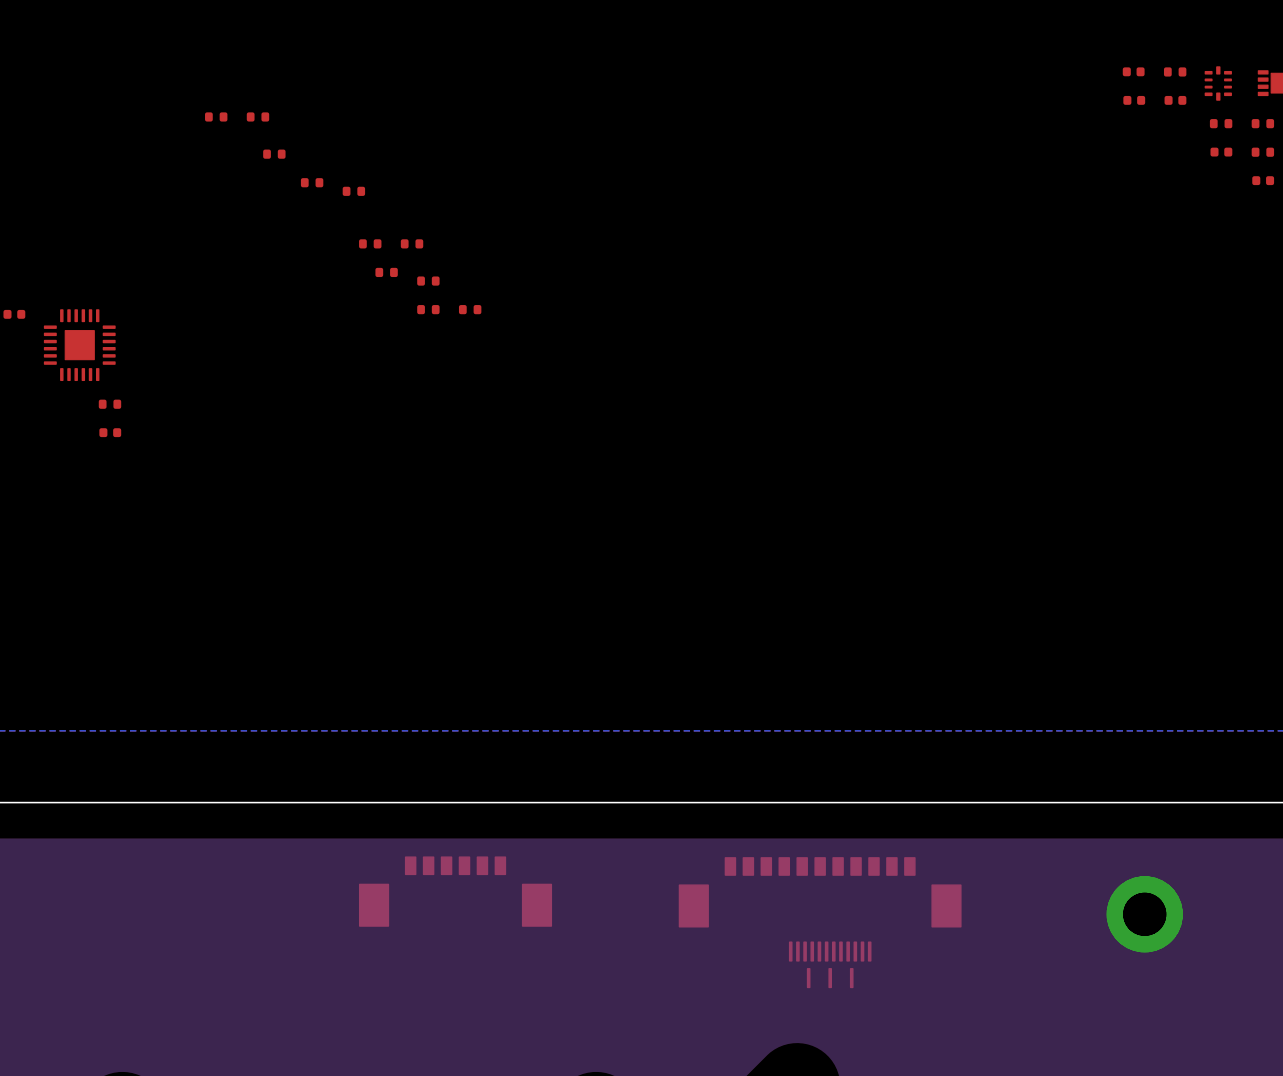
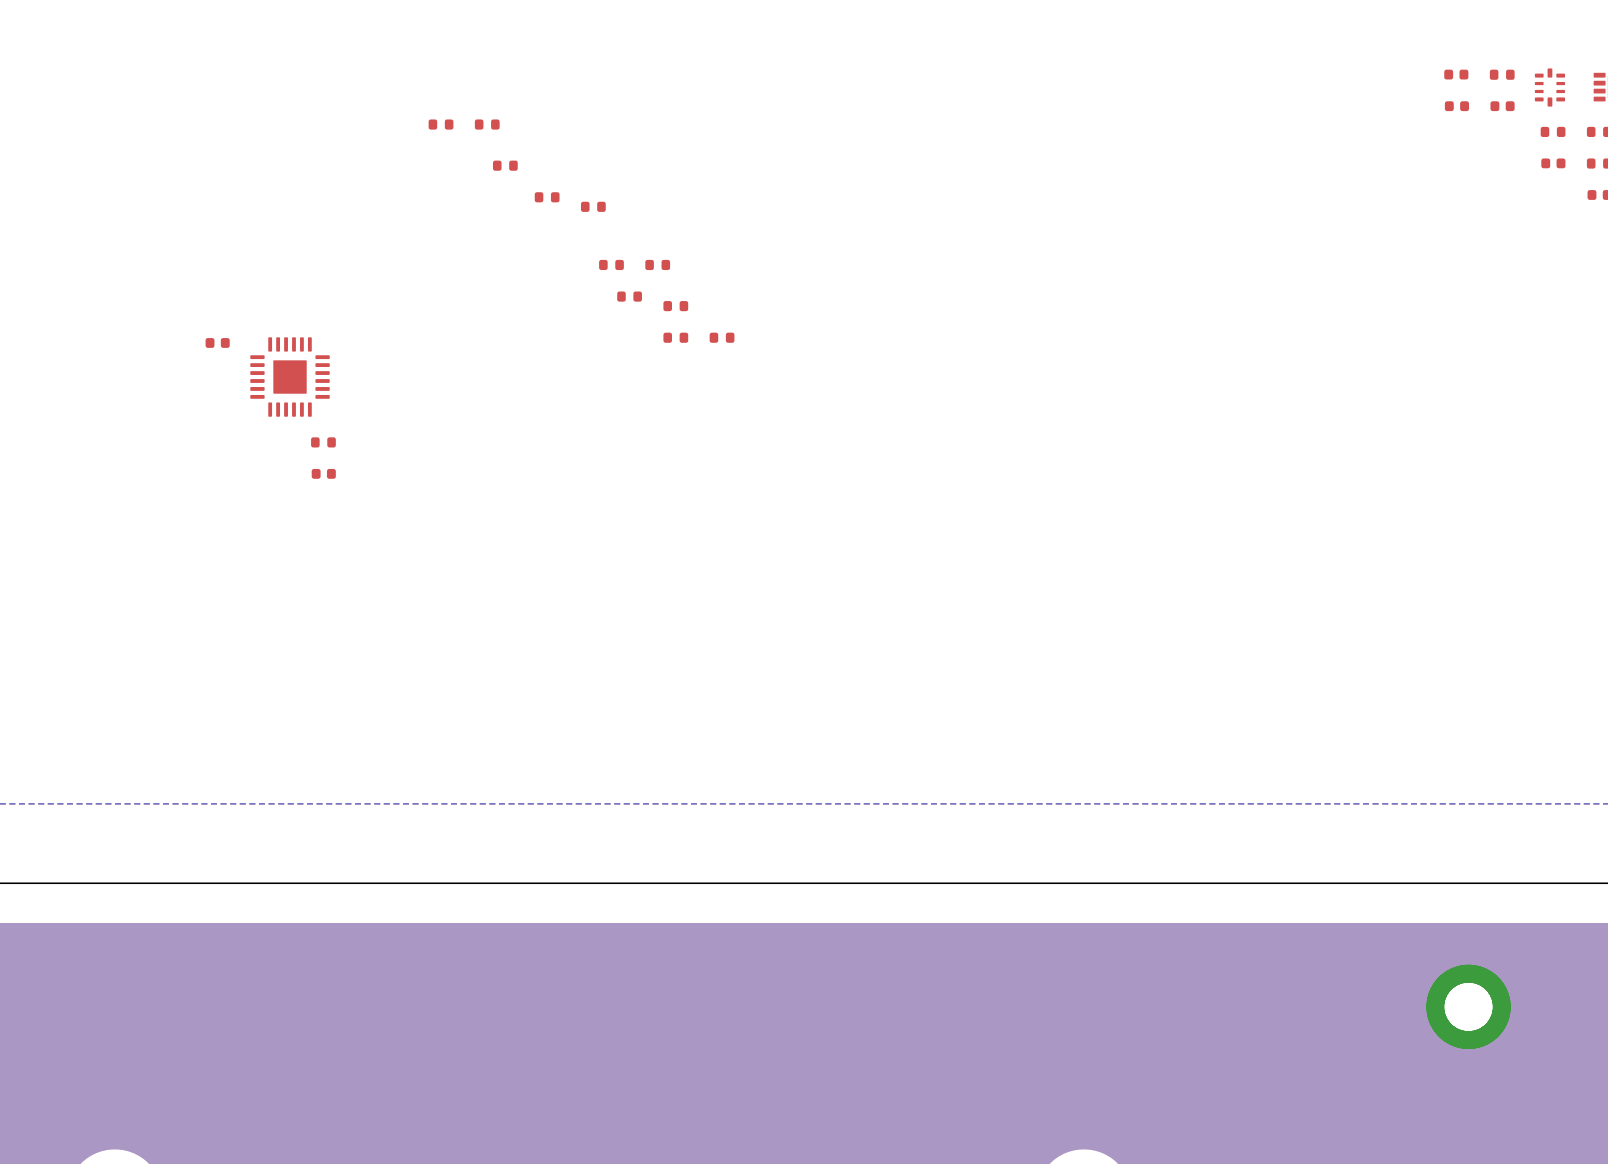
part: (455, 891) -> none
part: (820, 892) -> none
part: (830, 964) -> none

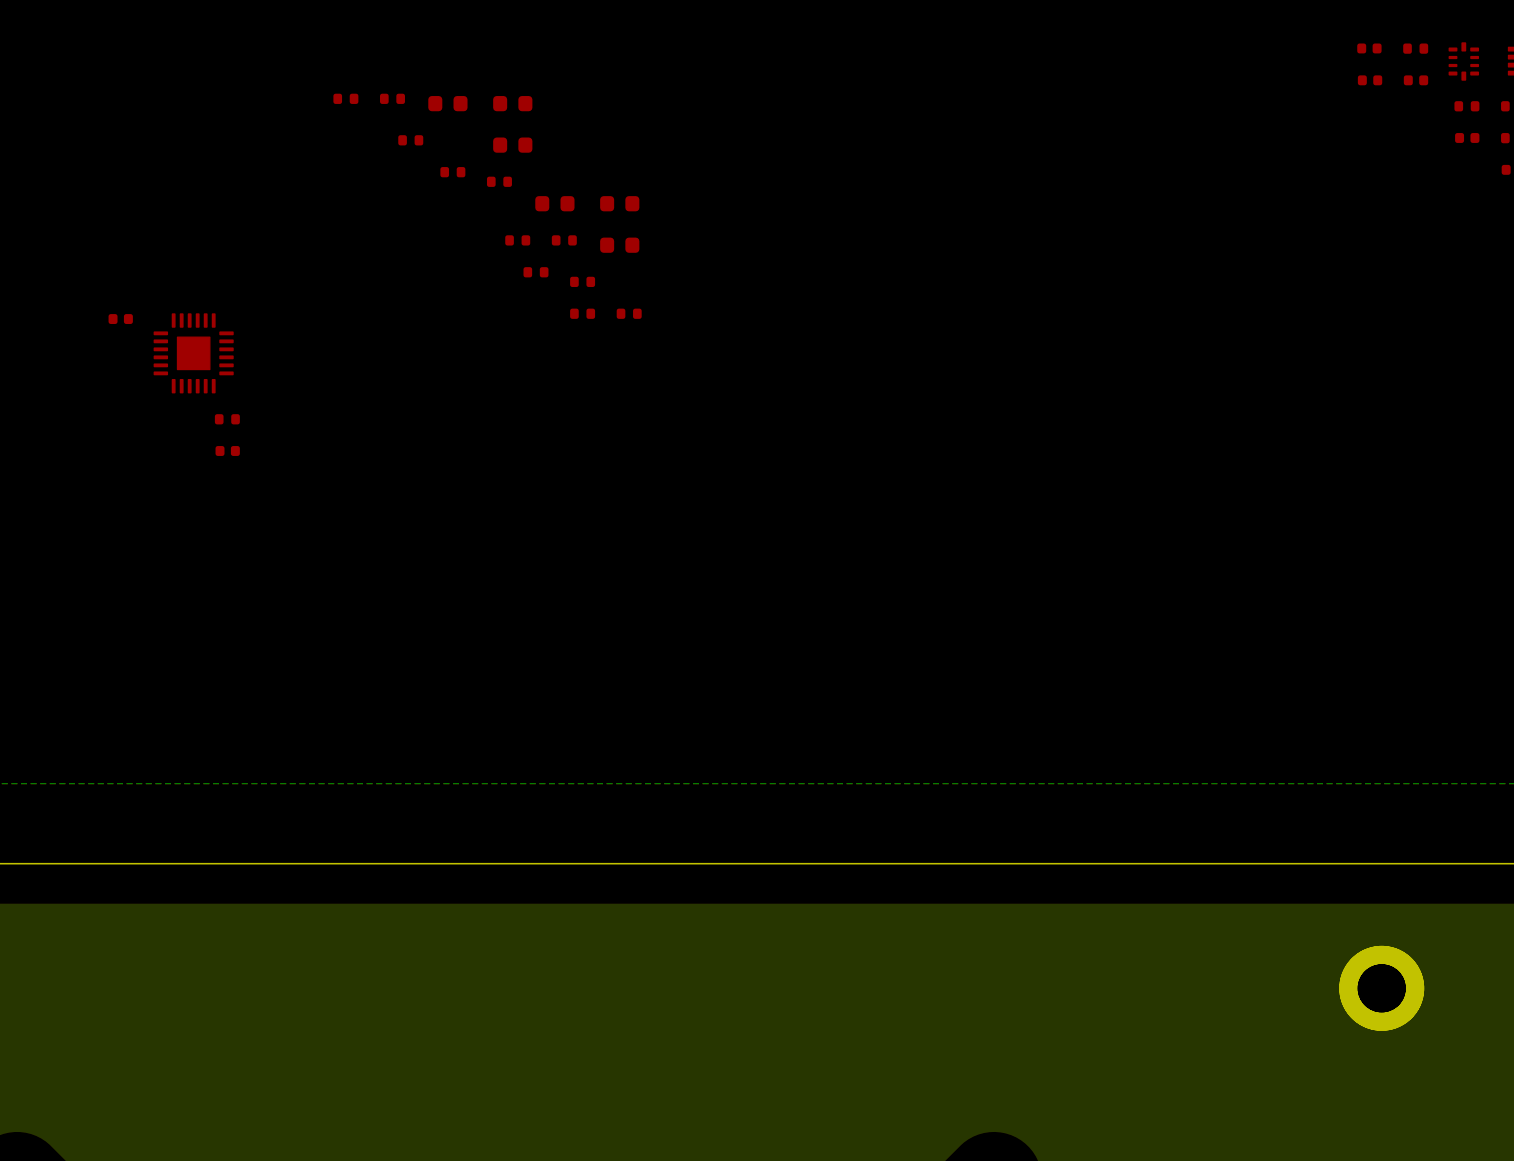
part: none -> (447, 103)
part: none -> (512, 103)
part: none -> (512, 145)
part: none -> (554, 203)
part: none -> (619, 203)
part: none -> (619, 245)

